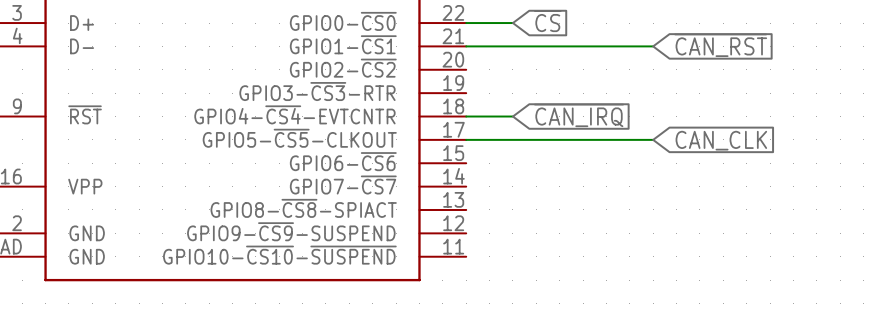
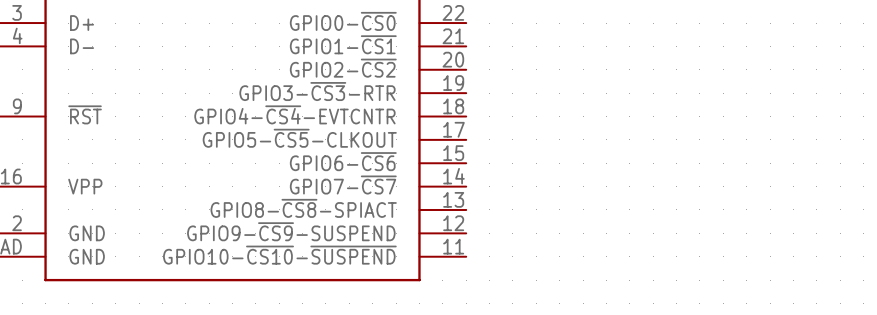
global label: ~{CS} (547, 21) -> none
wire: (466, 23) (512, 23) -> none
global label: ~{CAN_RST} (720, 45) -> none
wire: (466, 46) (653, 46) -> none
global label: ~{CAN_IRQ} (579, 115) -> none
wire: (466, 116) (512, 116) -> none
wire: (466, 139) (653, 139) -> none
global label: CAN_CLK (721, 140) -> none

